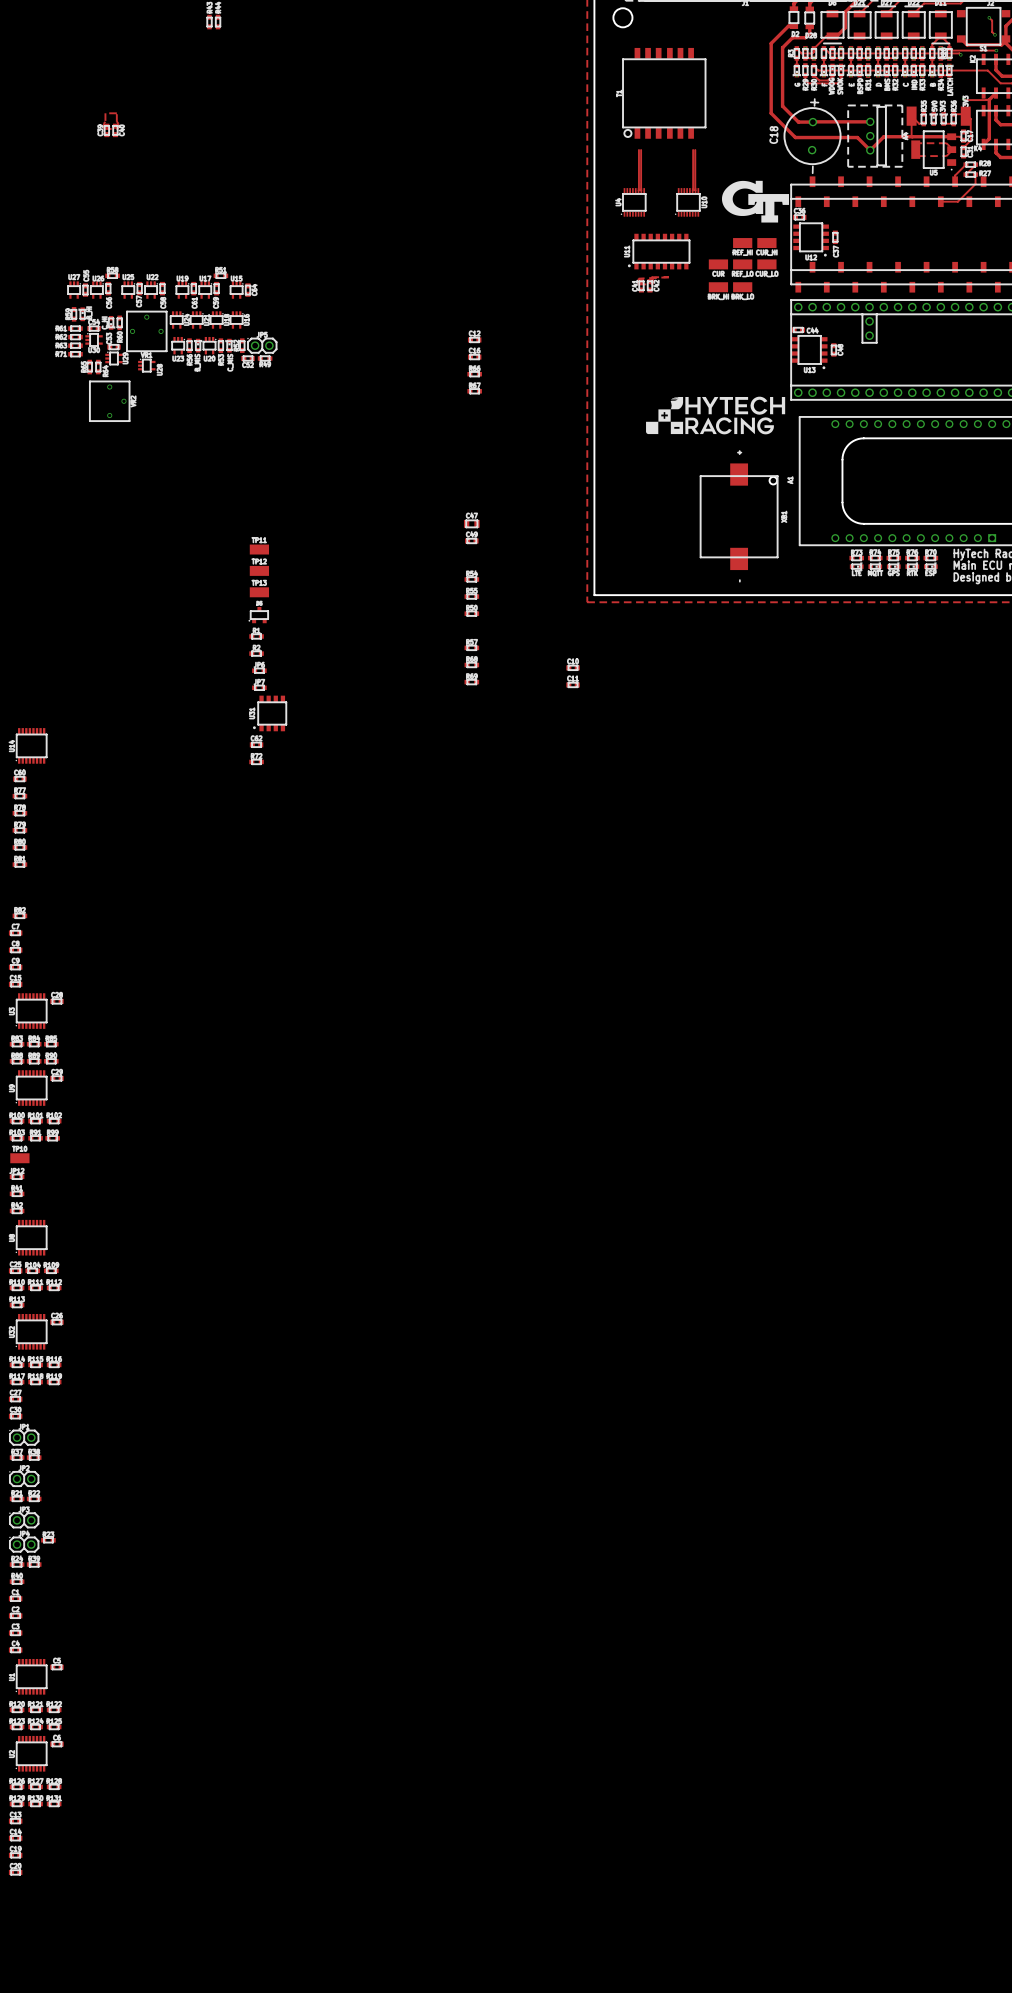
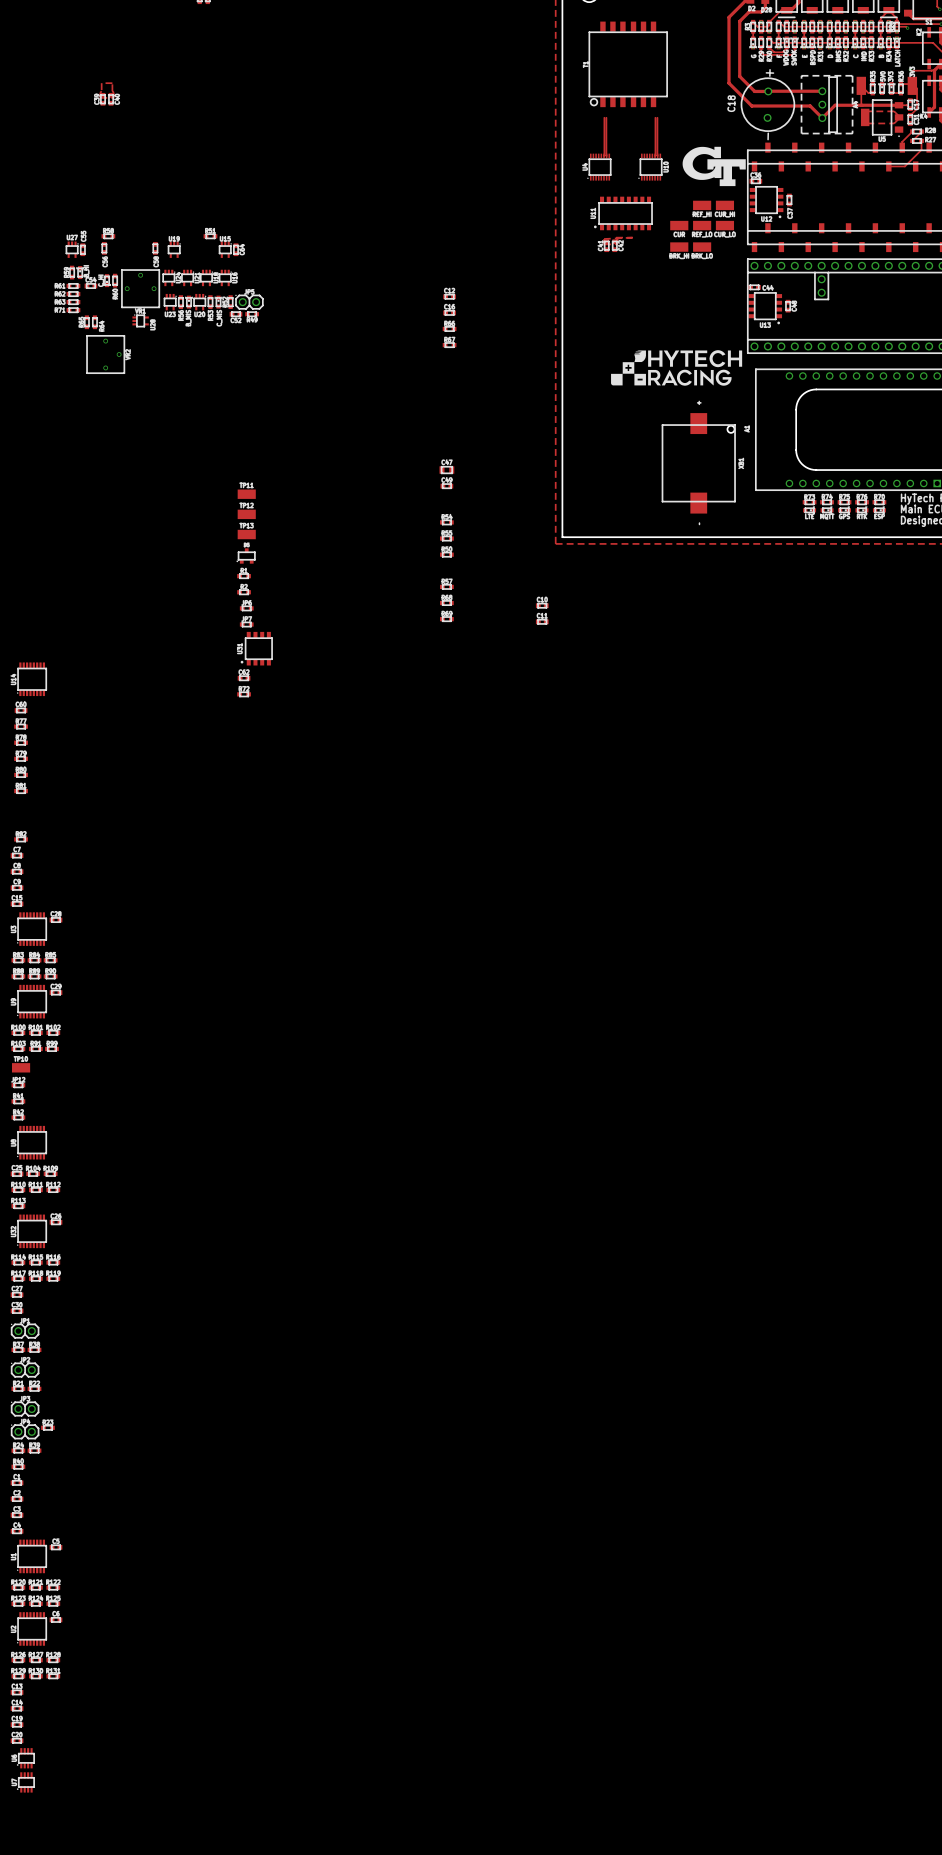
part: (139, 288) -> none
part: (193, 288) -> none
part: (216, 288) -> none
part: (97, 290) -> none
part: (128, 290) -> none
part: (151, 290) -> none
part: (205, 290) -> none
part: (94, 339) -> none
part: (114, 347) -> none
part: (114, 358) -> none
part: none -> (25, 1758)
part: none -> (25, 1782)

